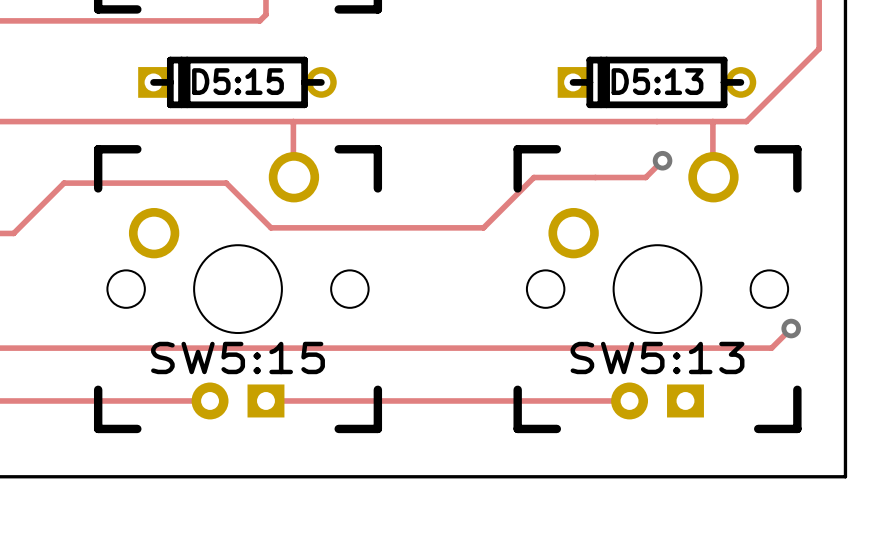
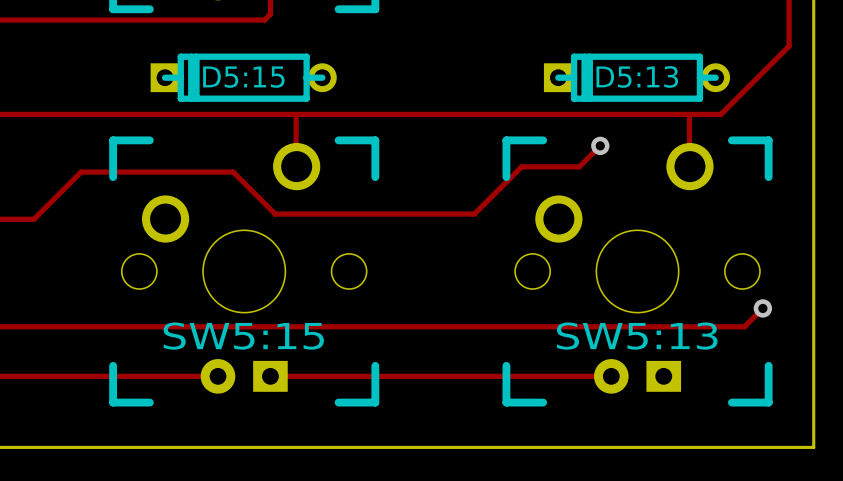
track: (662, 160) (645, 177) (595, 177) -> (600, 145) (579, 166)
via position: (662, 160) -> (600, 145)

